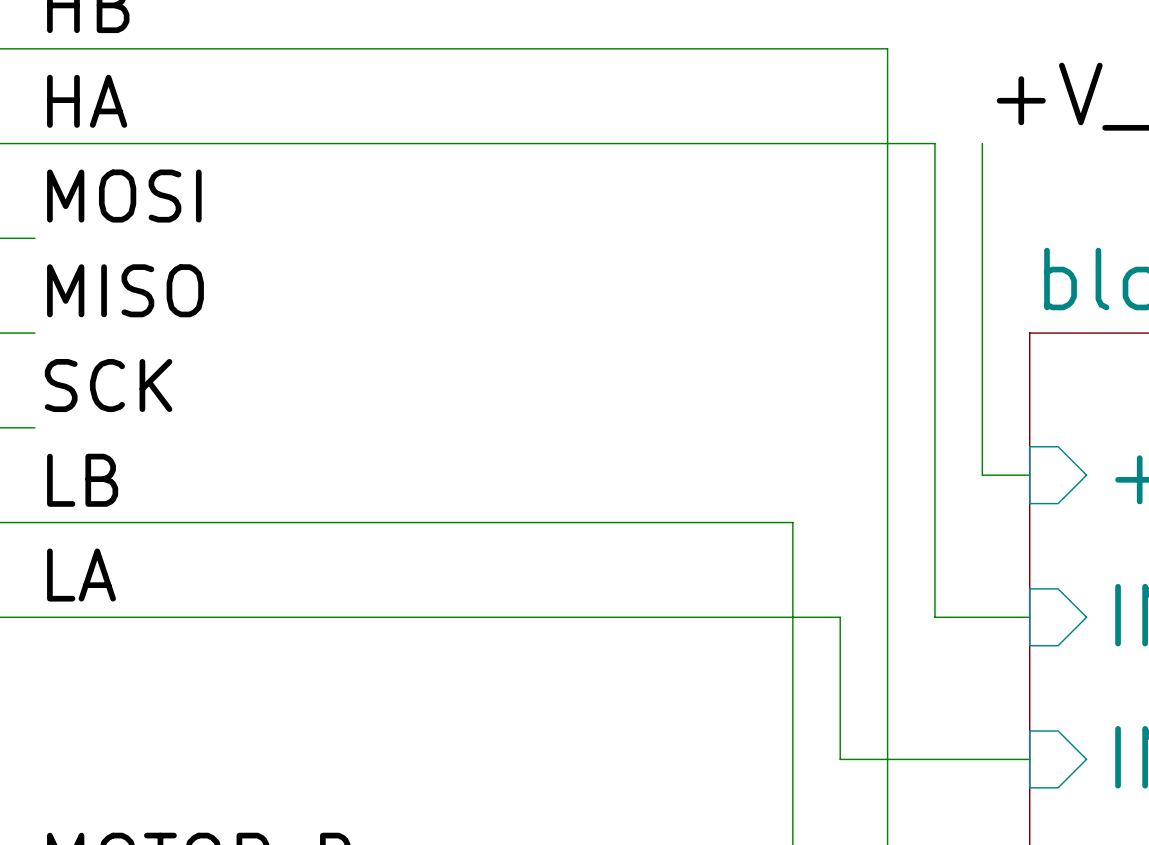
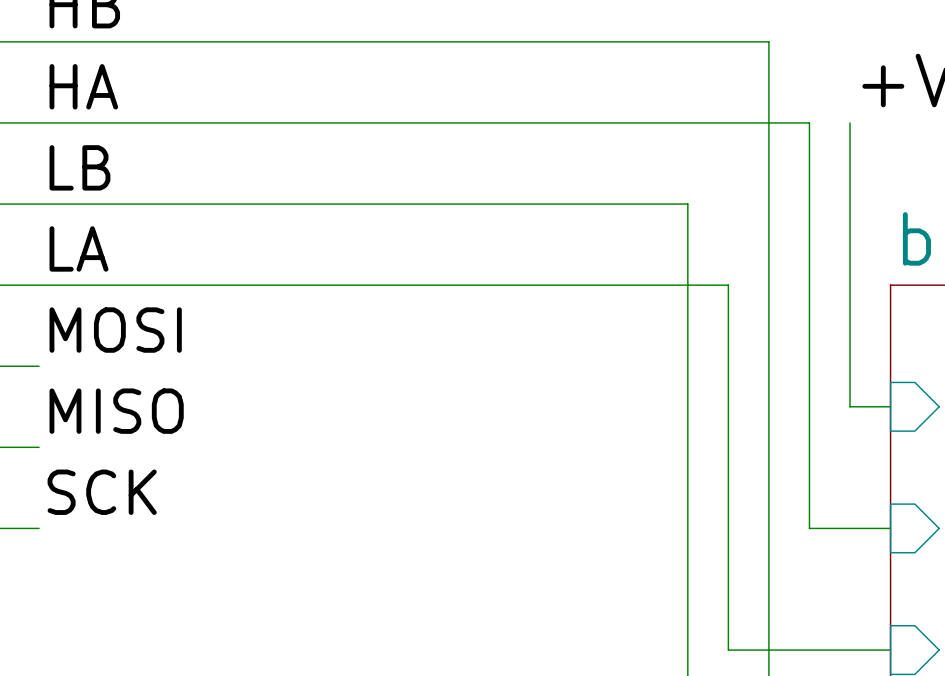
label: MOSI (124, 196) -> LB (79, 167)
label: MISO (125, 290) -> LA (78, 248)
label: SCK (108, 385) -> MOSI (115, 330)
label: LB (82, 480) -> MISO (116, 411)
wire: (34, 522) (792, 522) -> (39, 204) (687, 204) (687, 447)
label: LA (81, 575) -> SCK (102, 492)
wire: (34, 617) (840, 617) -> (39, 285) (728, 285) (728, 528)

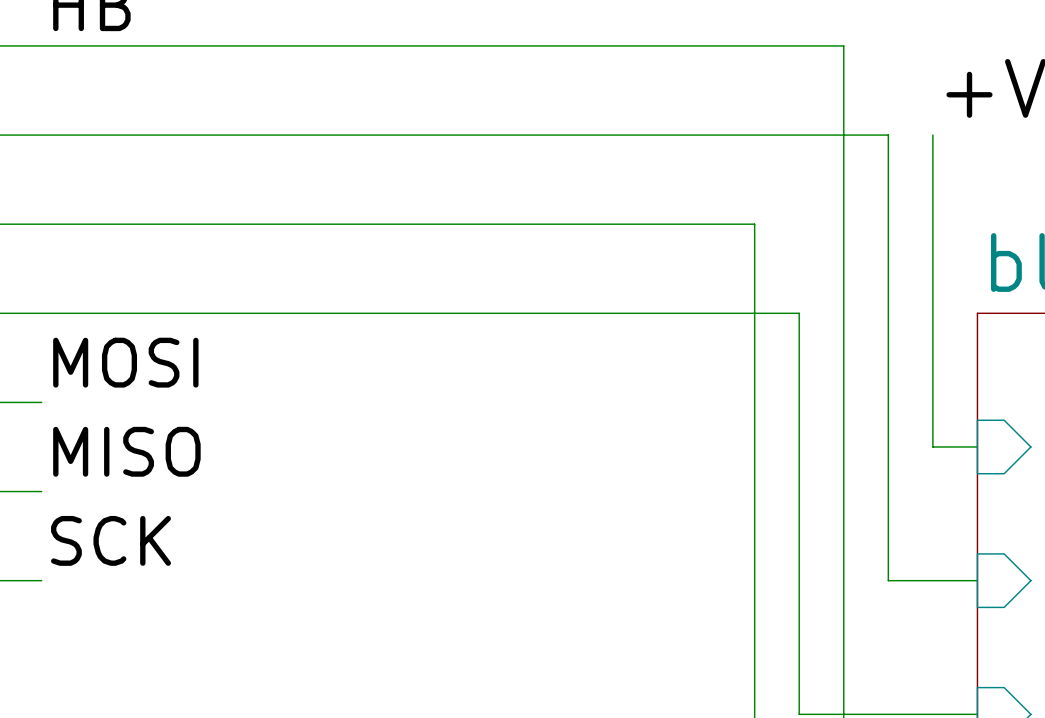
label: HA (83, 86) -> none
label: LB (79, 167) -> none
label: LA (78, 248) -> none

